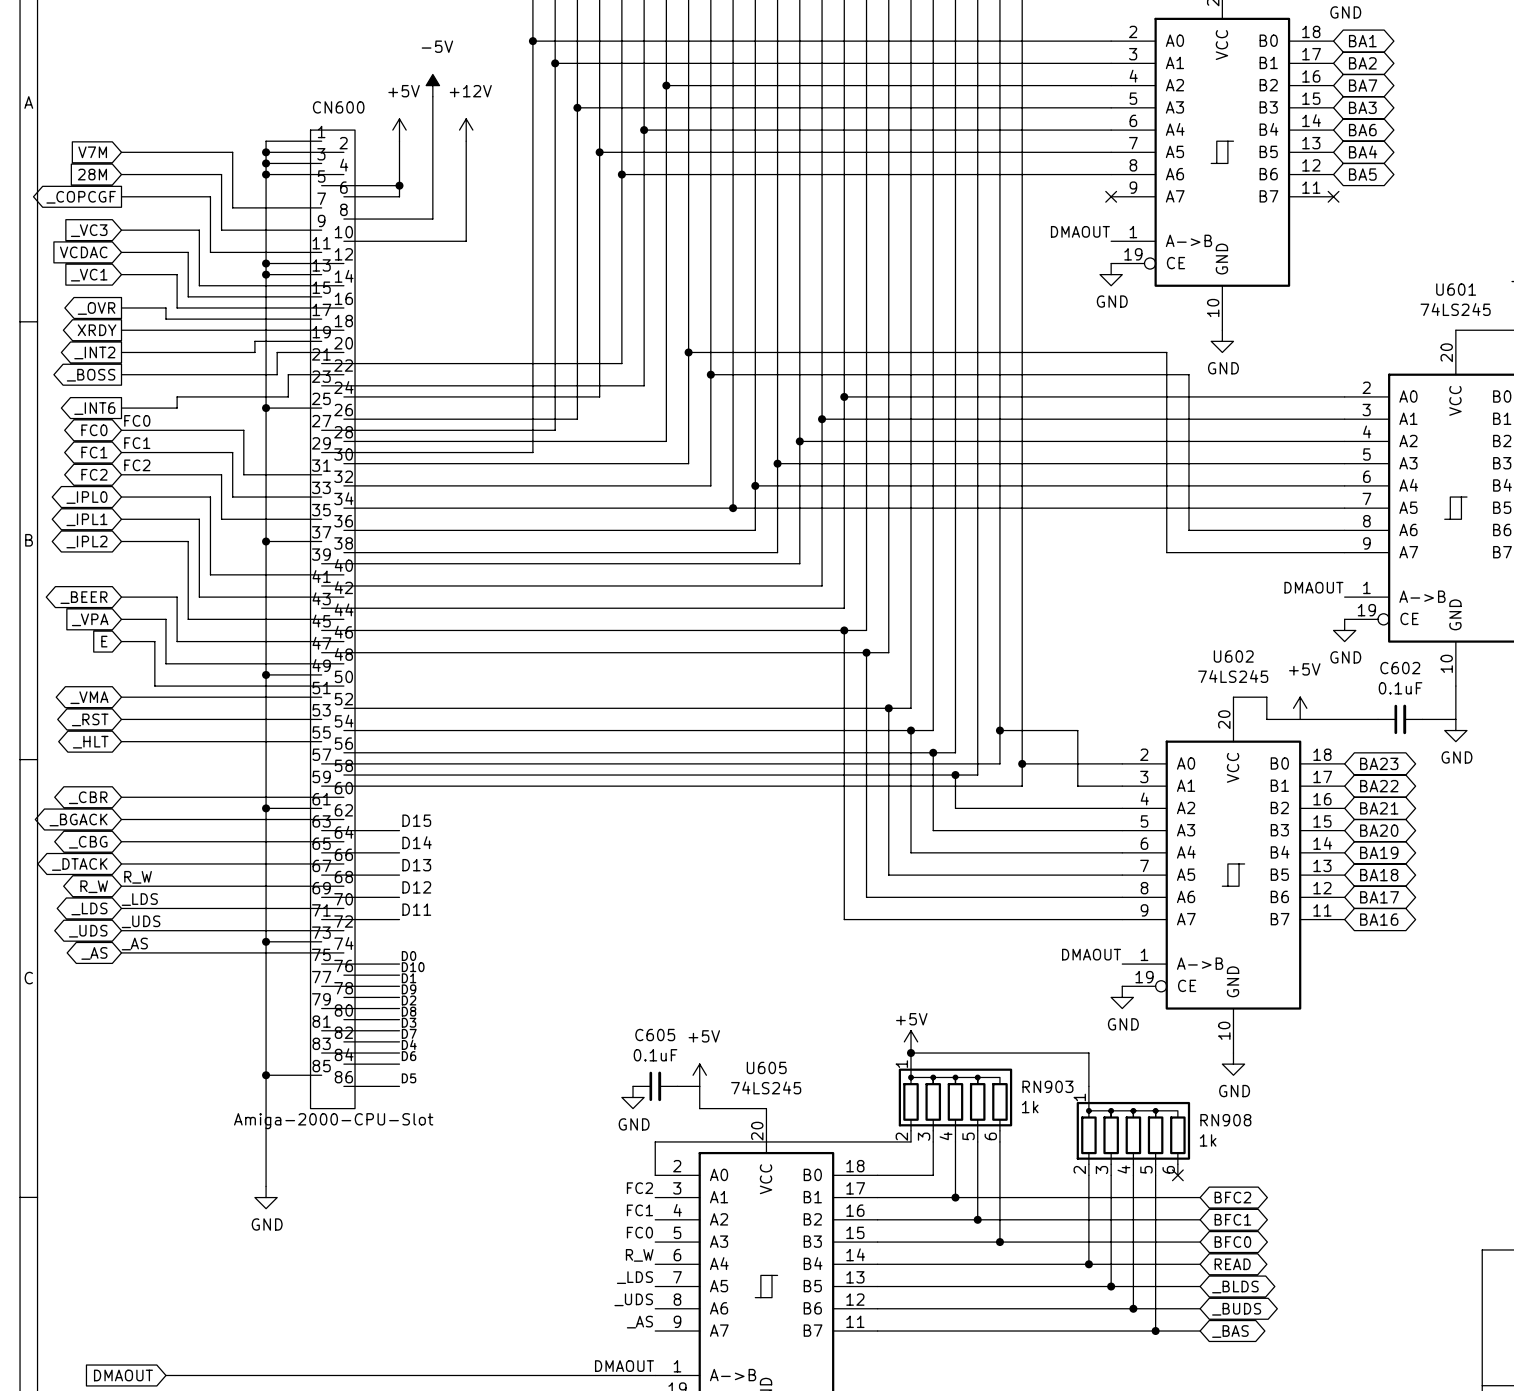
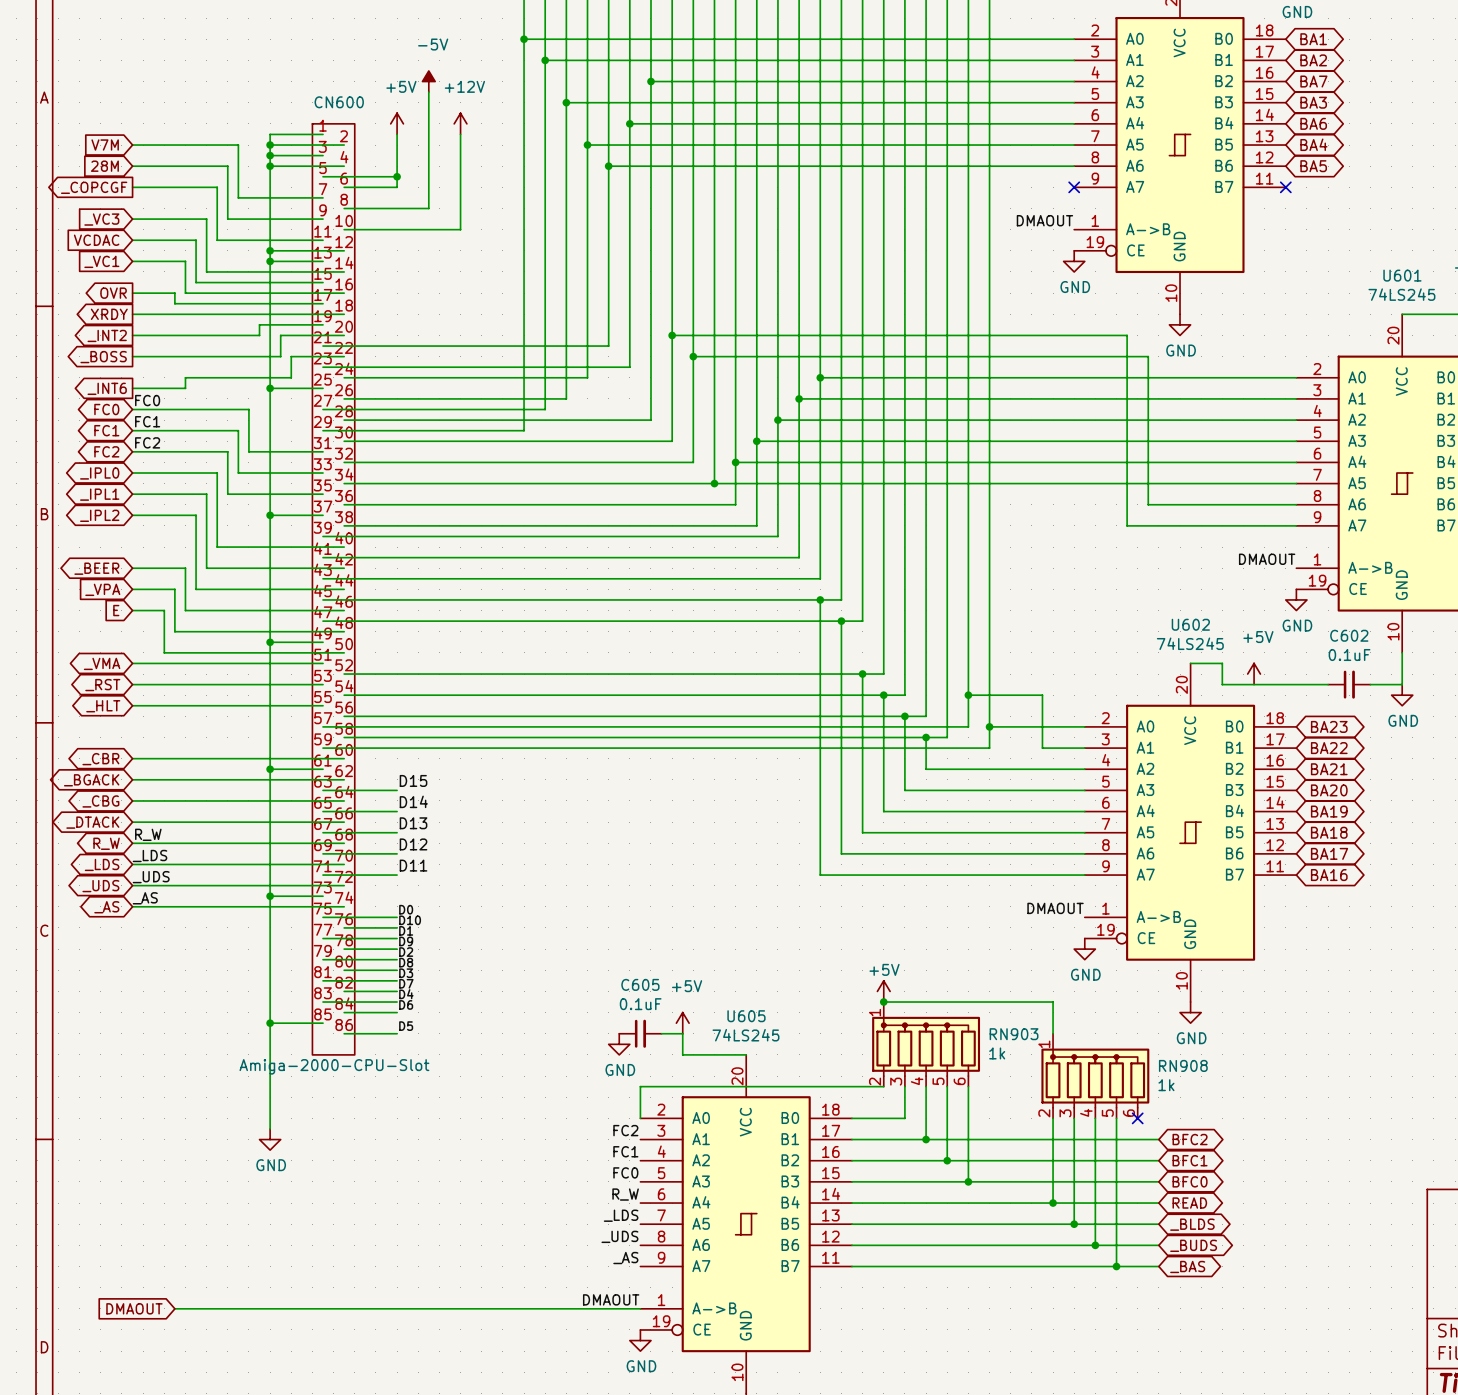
global label: _OVR (96, 308) -> OVR (113, 293)

